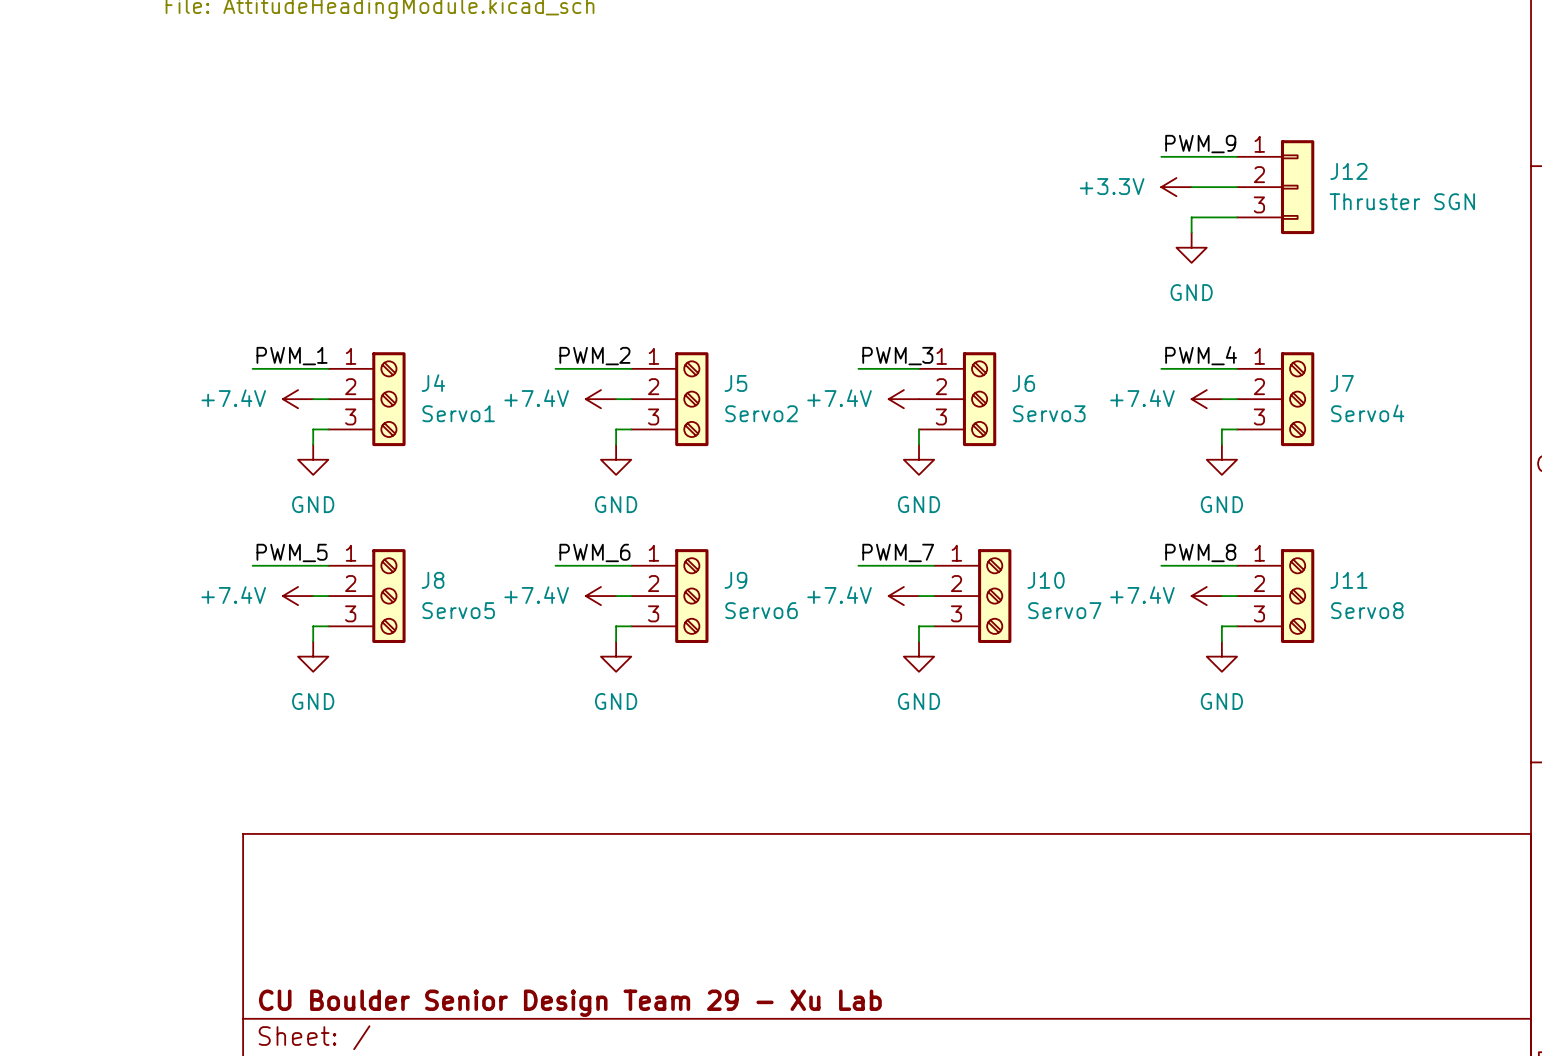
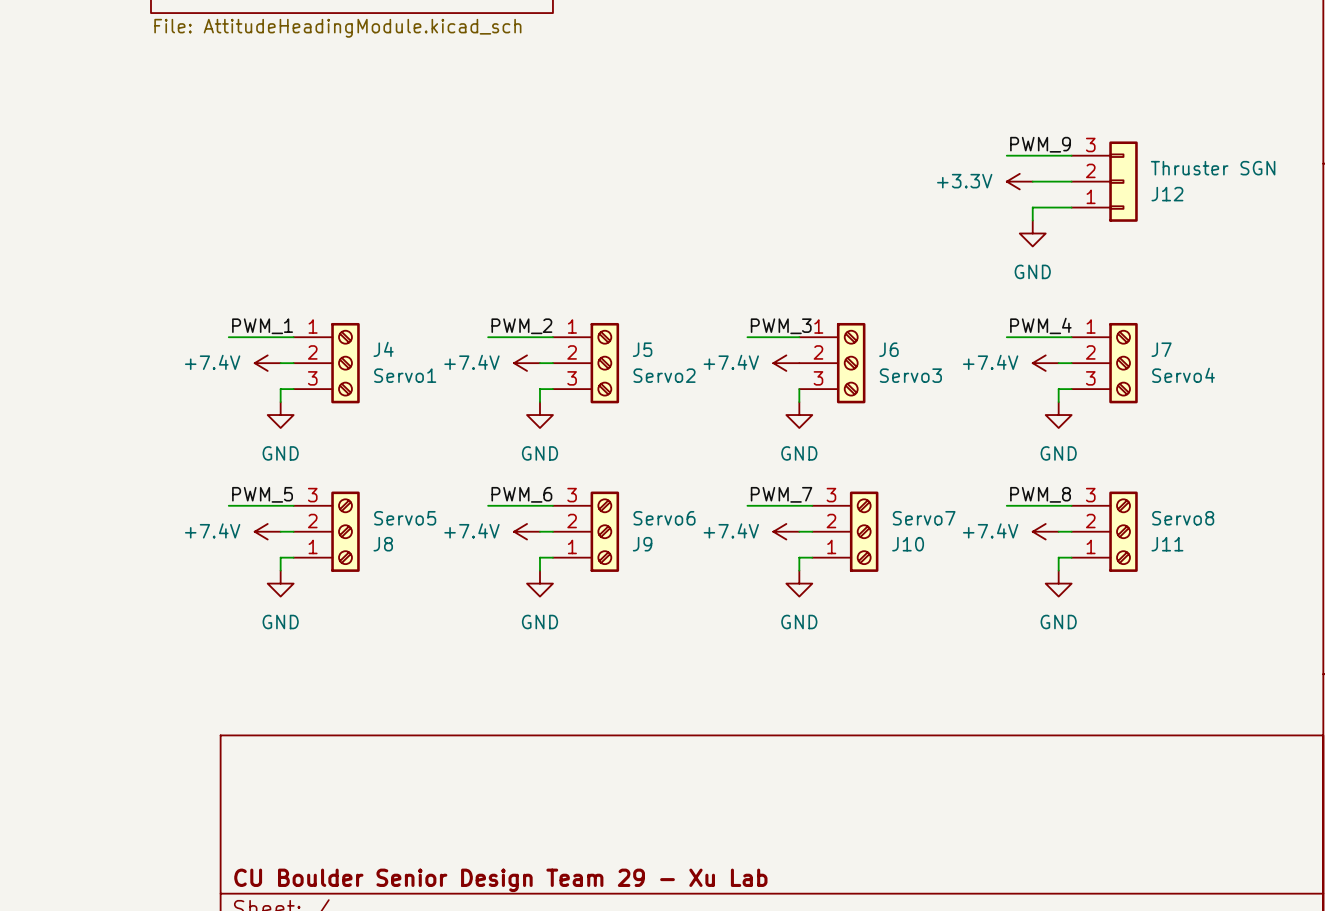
J12 flip: as is (1297, 187) -> up-down (1123, 181)
J8 flip: as is (388, 596) -> up-down (345, 531)
J9 flip: as is (691, 596) -> up-down (604, 531)
J10 flip: as is (994, 596) -> up-down (864, 531)
J11 flip: as is (1297, 596) -> up-down (1123, 531)

